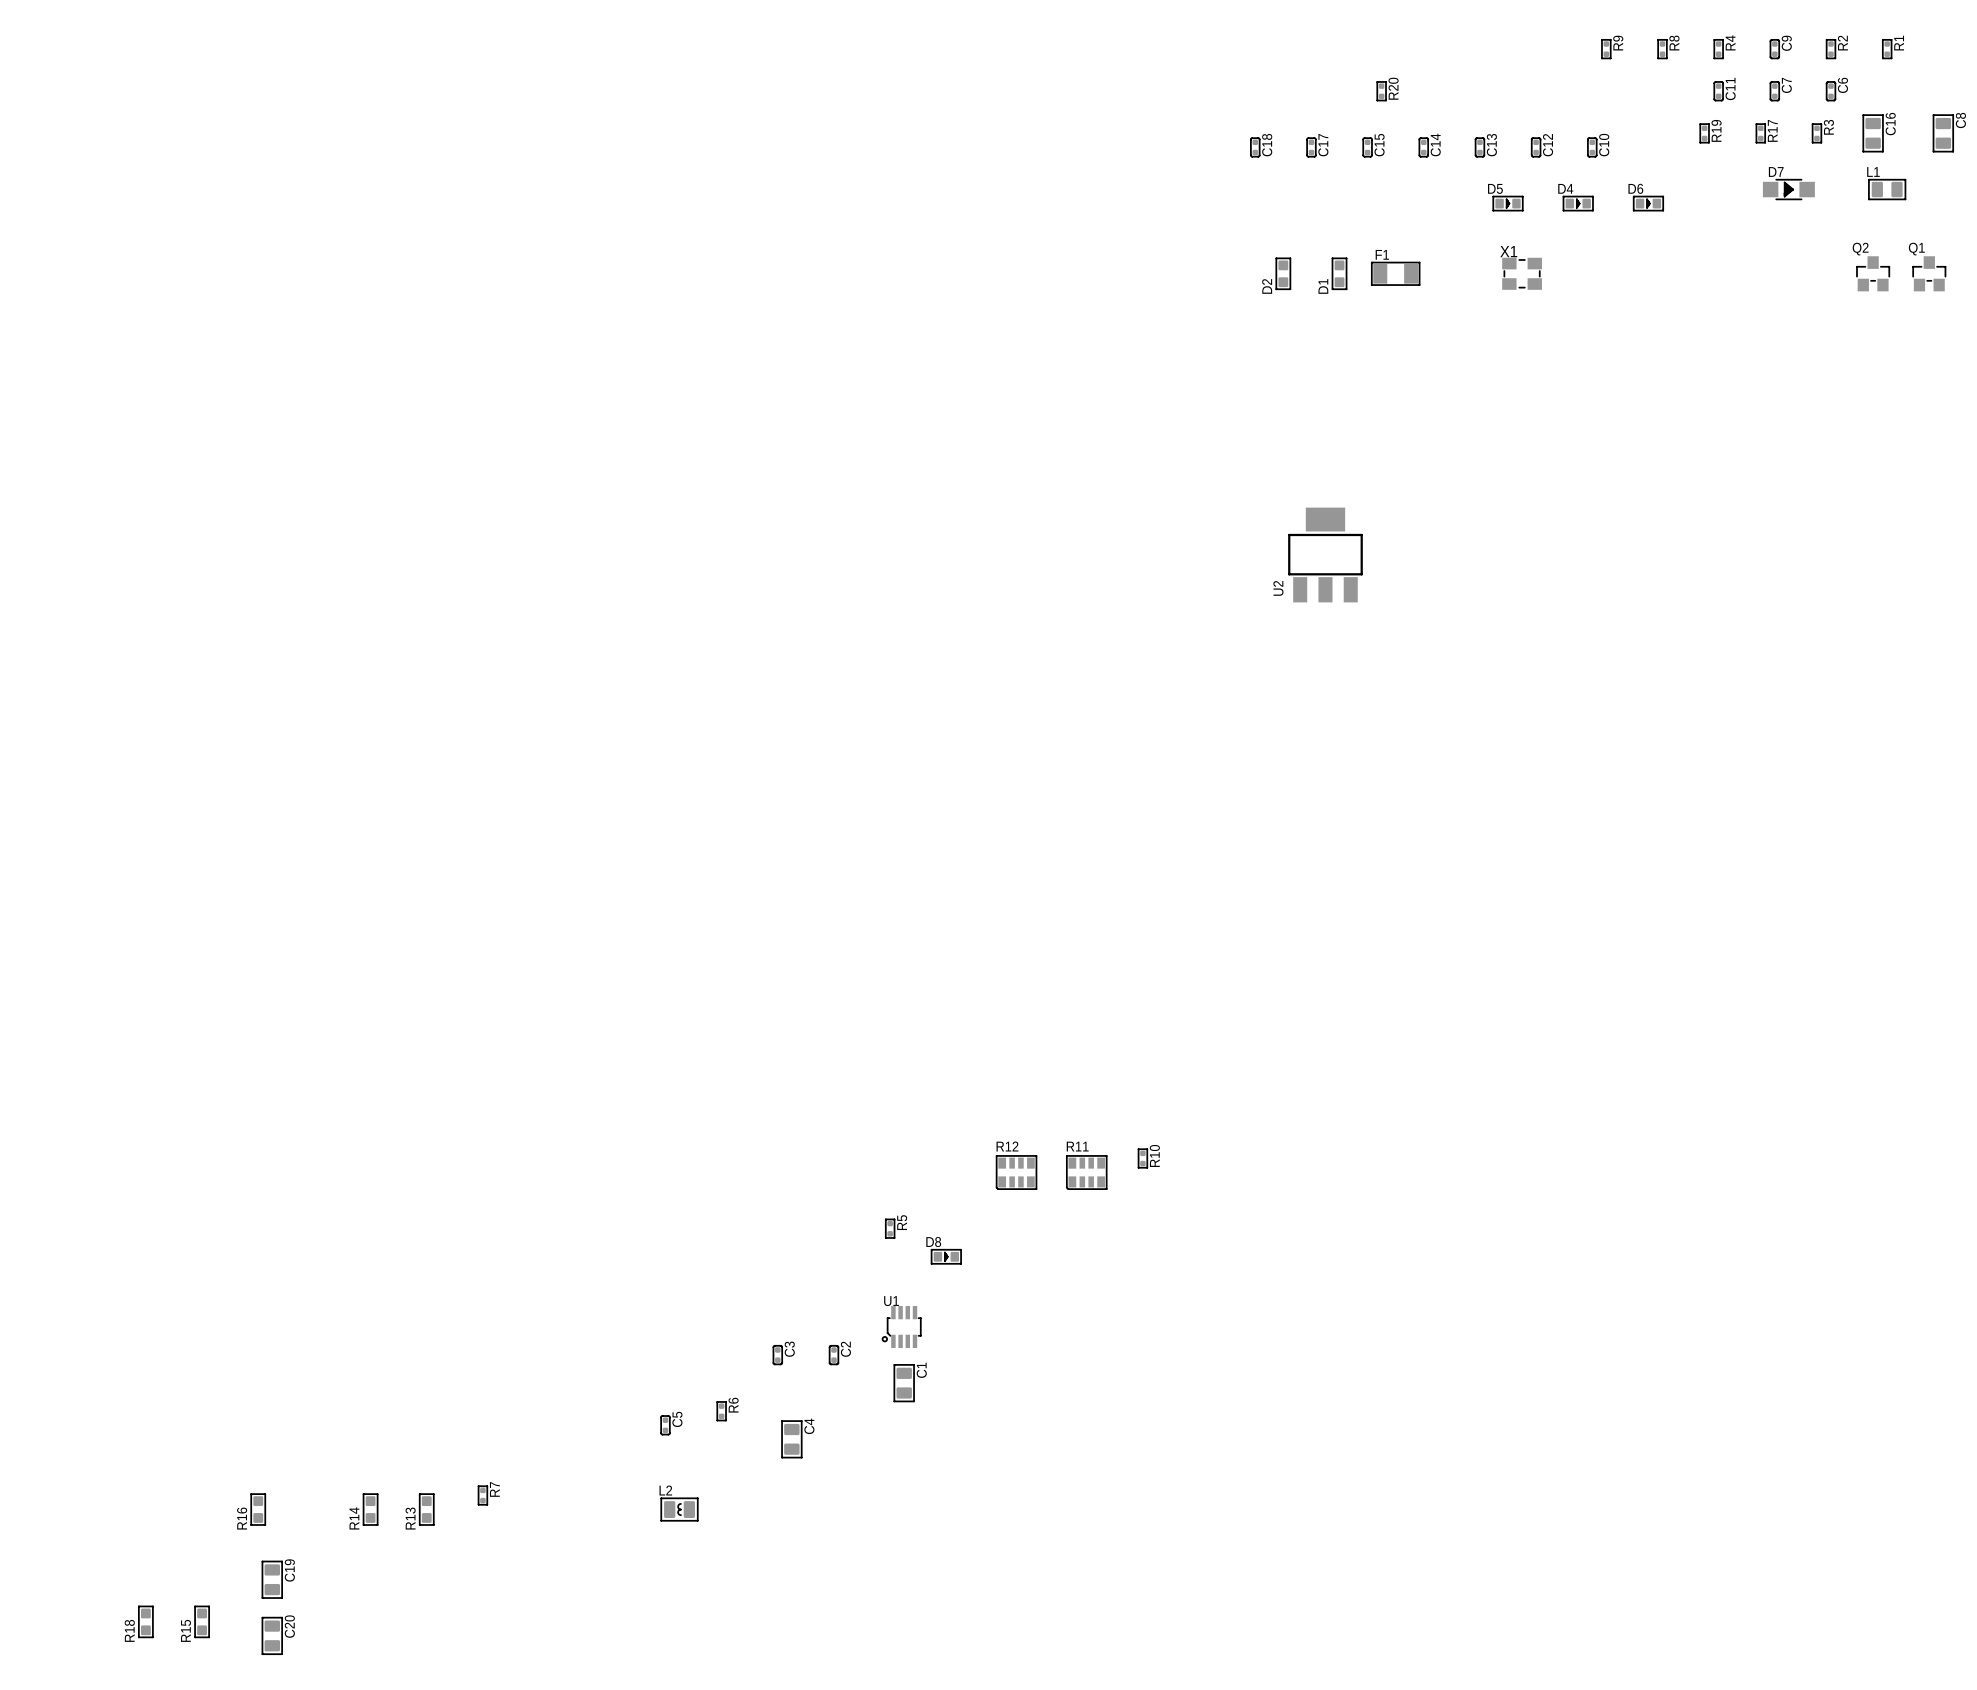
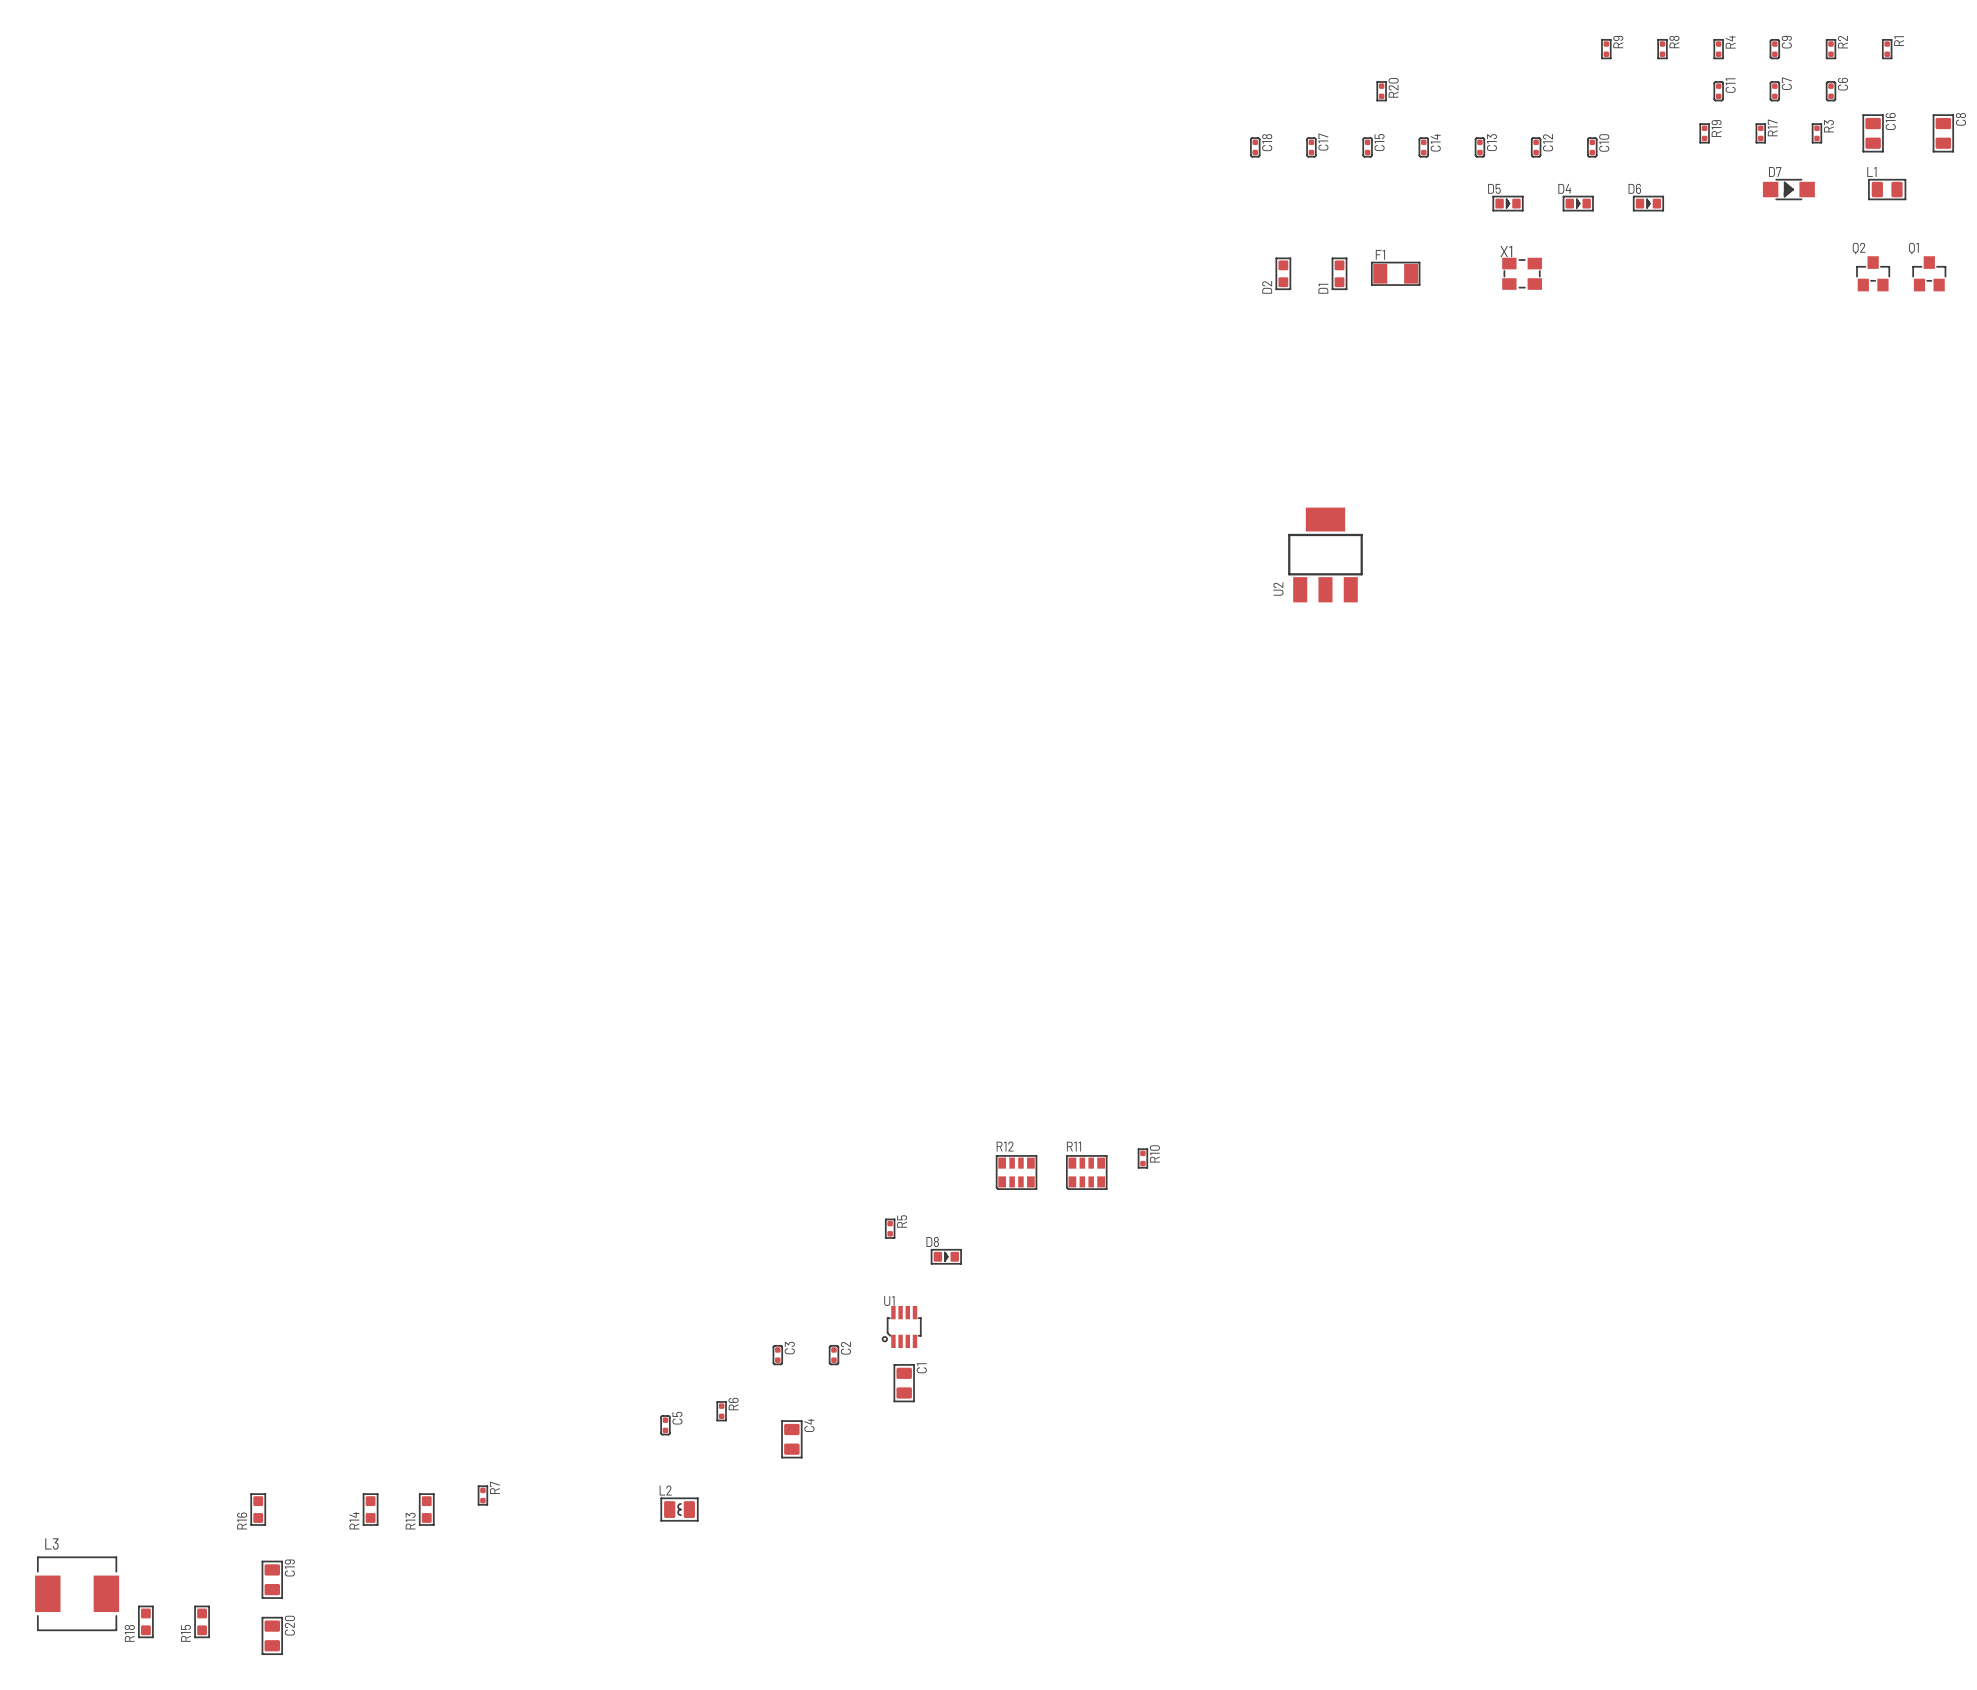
L3: none -> (77, 1593)

